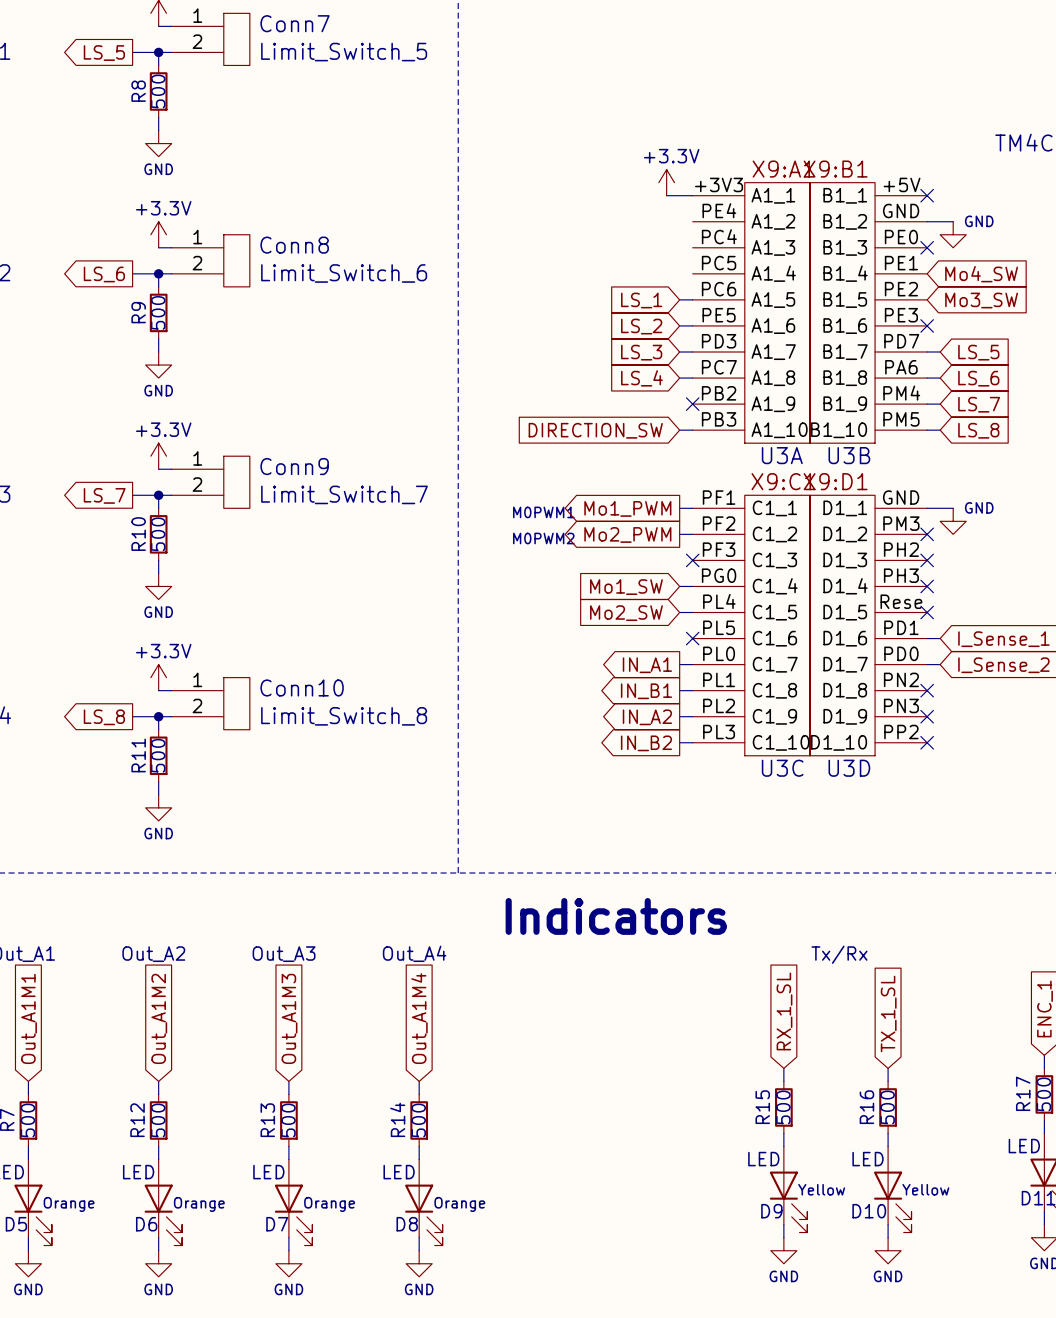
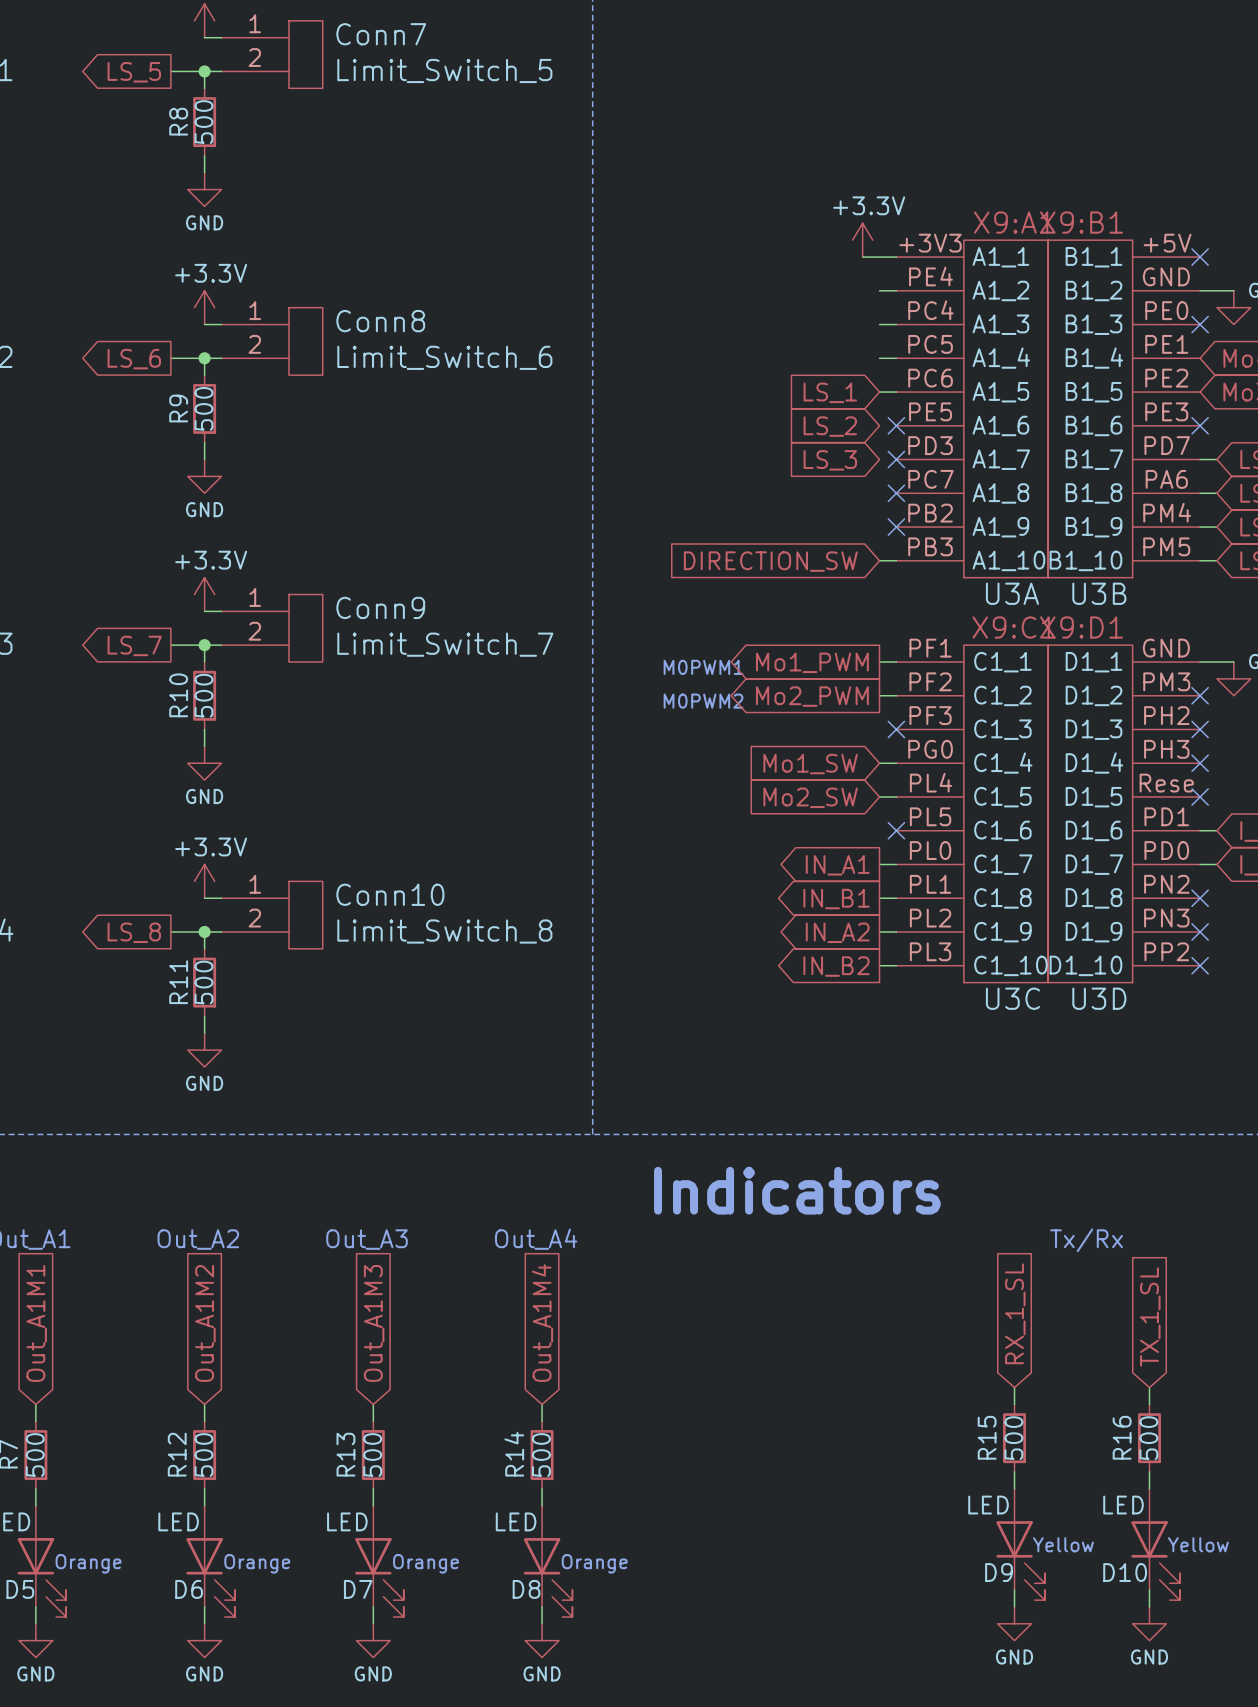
wire: (679, 325) (692, 325) -> (879, 290) (896, 290)
no-connect mark: none -> (896, 425)
wire: (679, 352) (692, 352) -> (879, 324) (896, 324)
no-connect mark: none -> (896, 459)
global label: LS_4 (641, 378) -> none
wire: (679, 378) (692, 378) -> (879, 358) (896, 358)
no-connect mark: none -> (896, 493)

